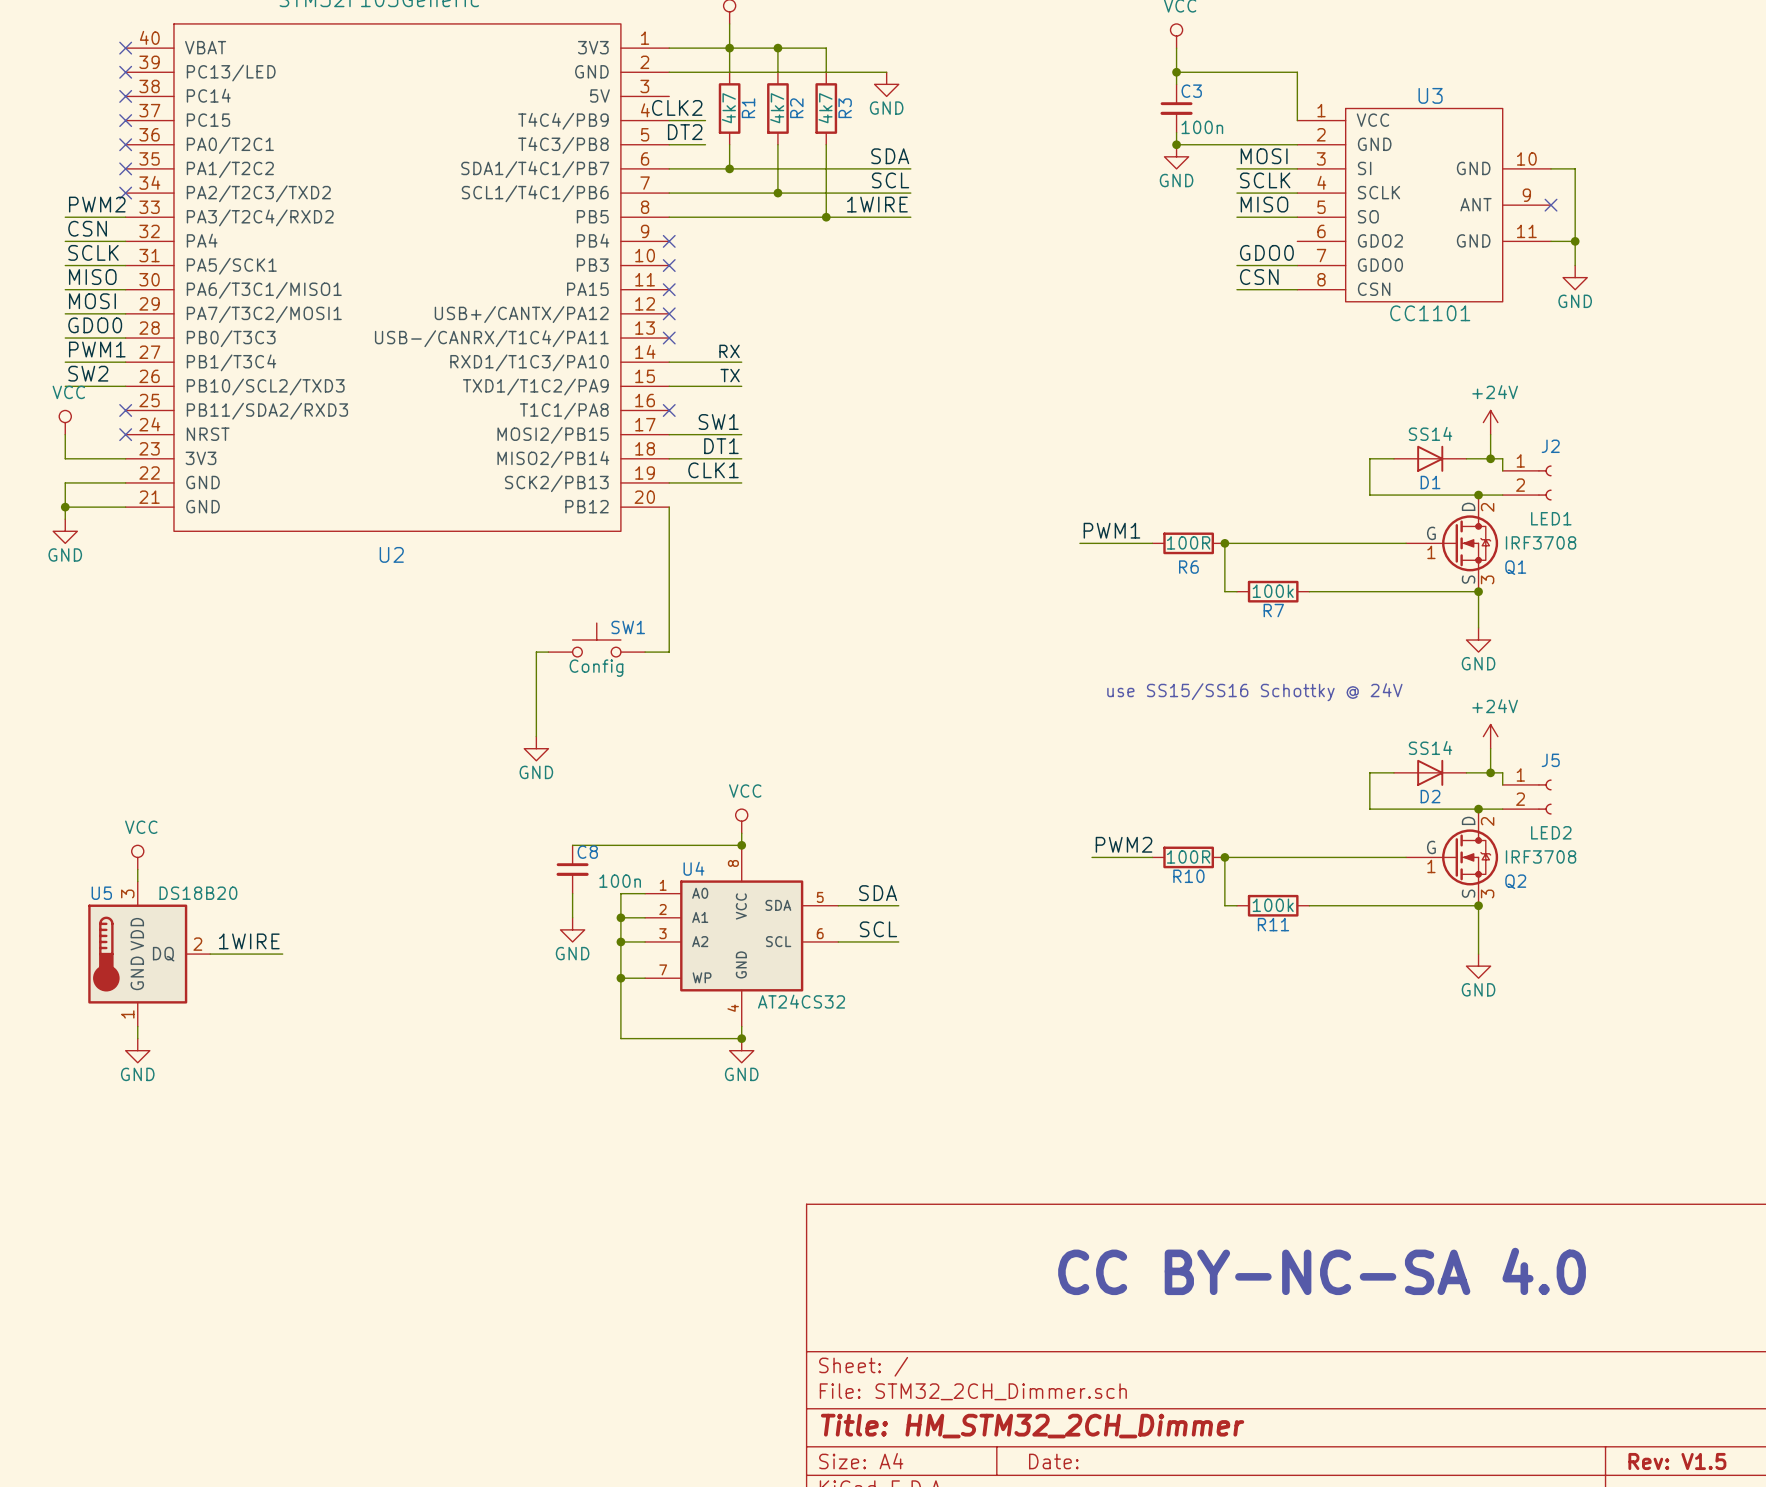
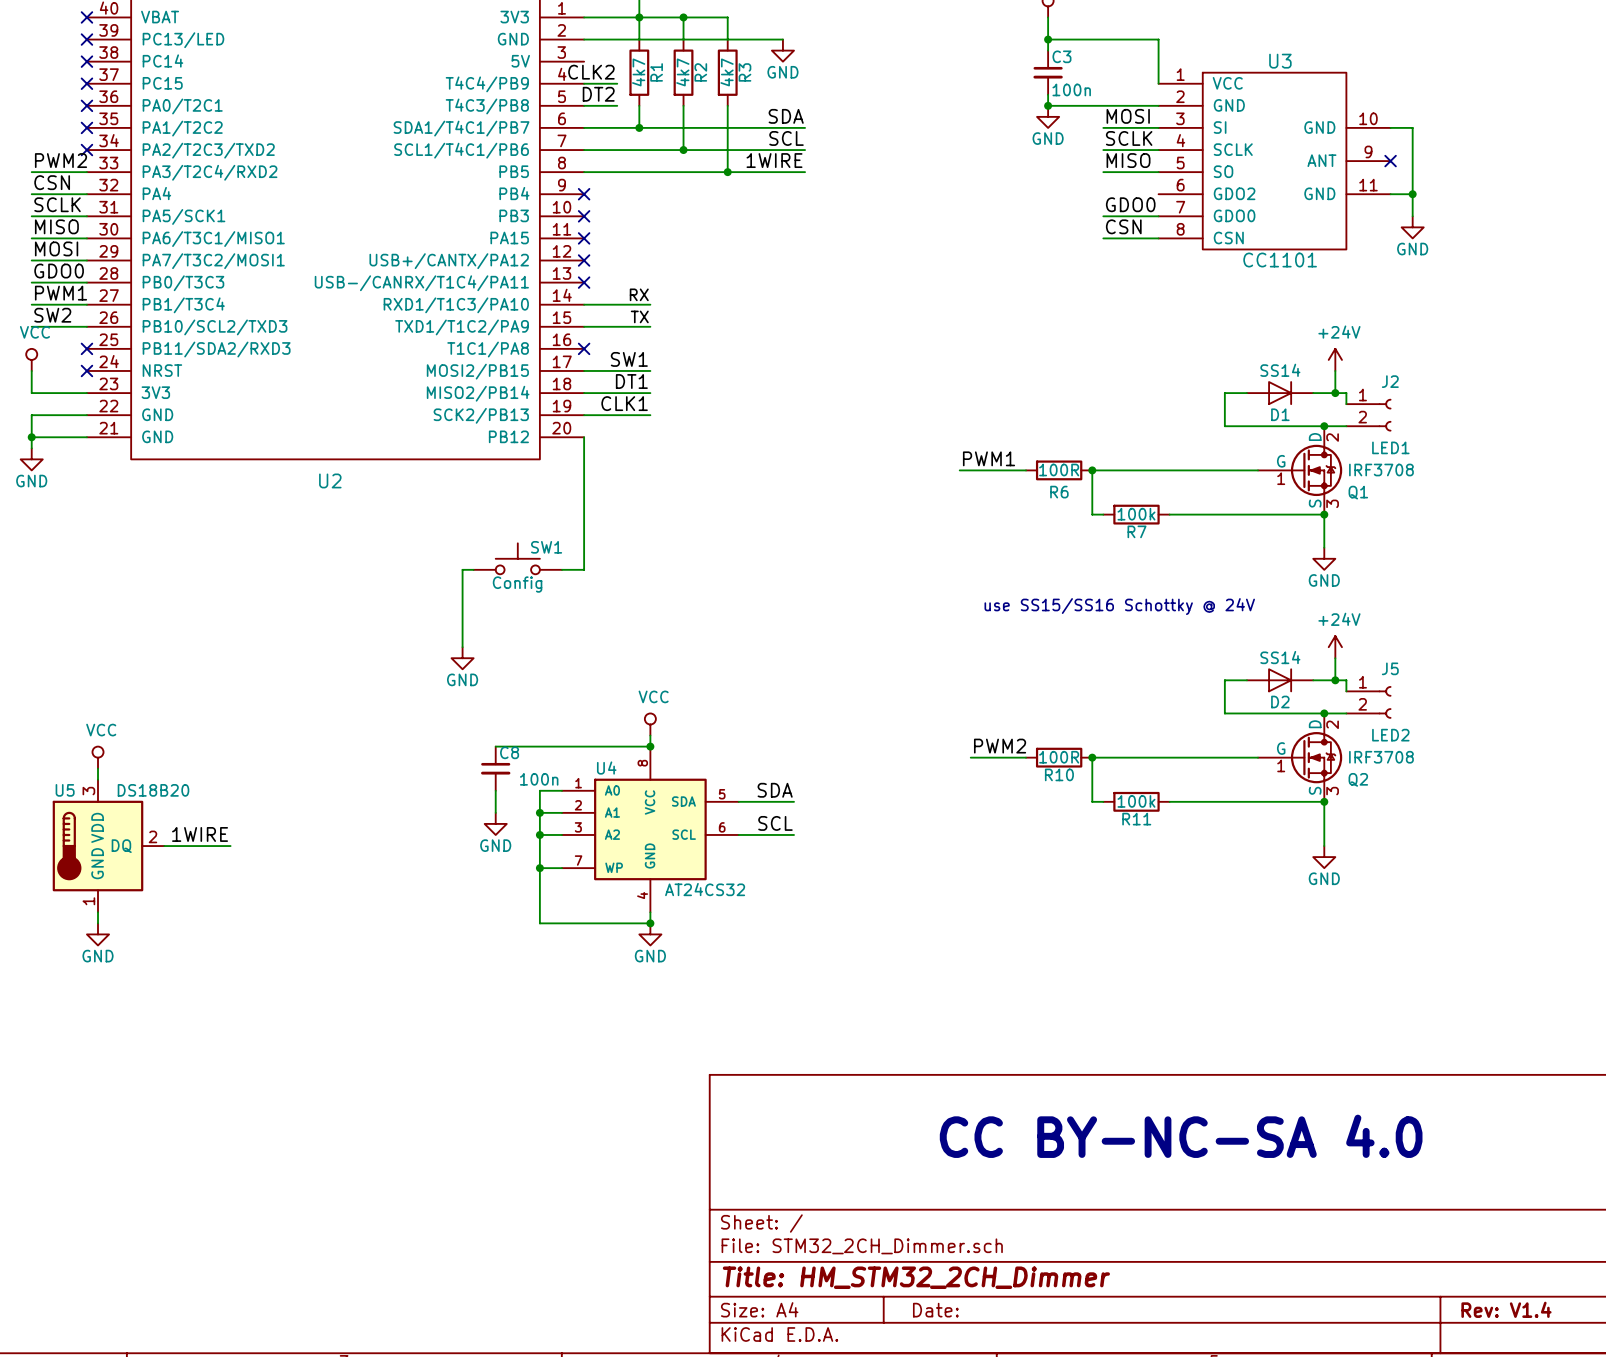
title block: Rev: V1.5 (1677, 1461) -> Rev: V1.4 (1506, 1309)

